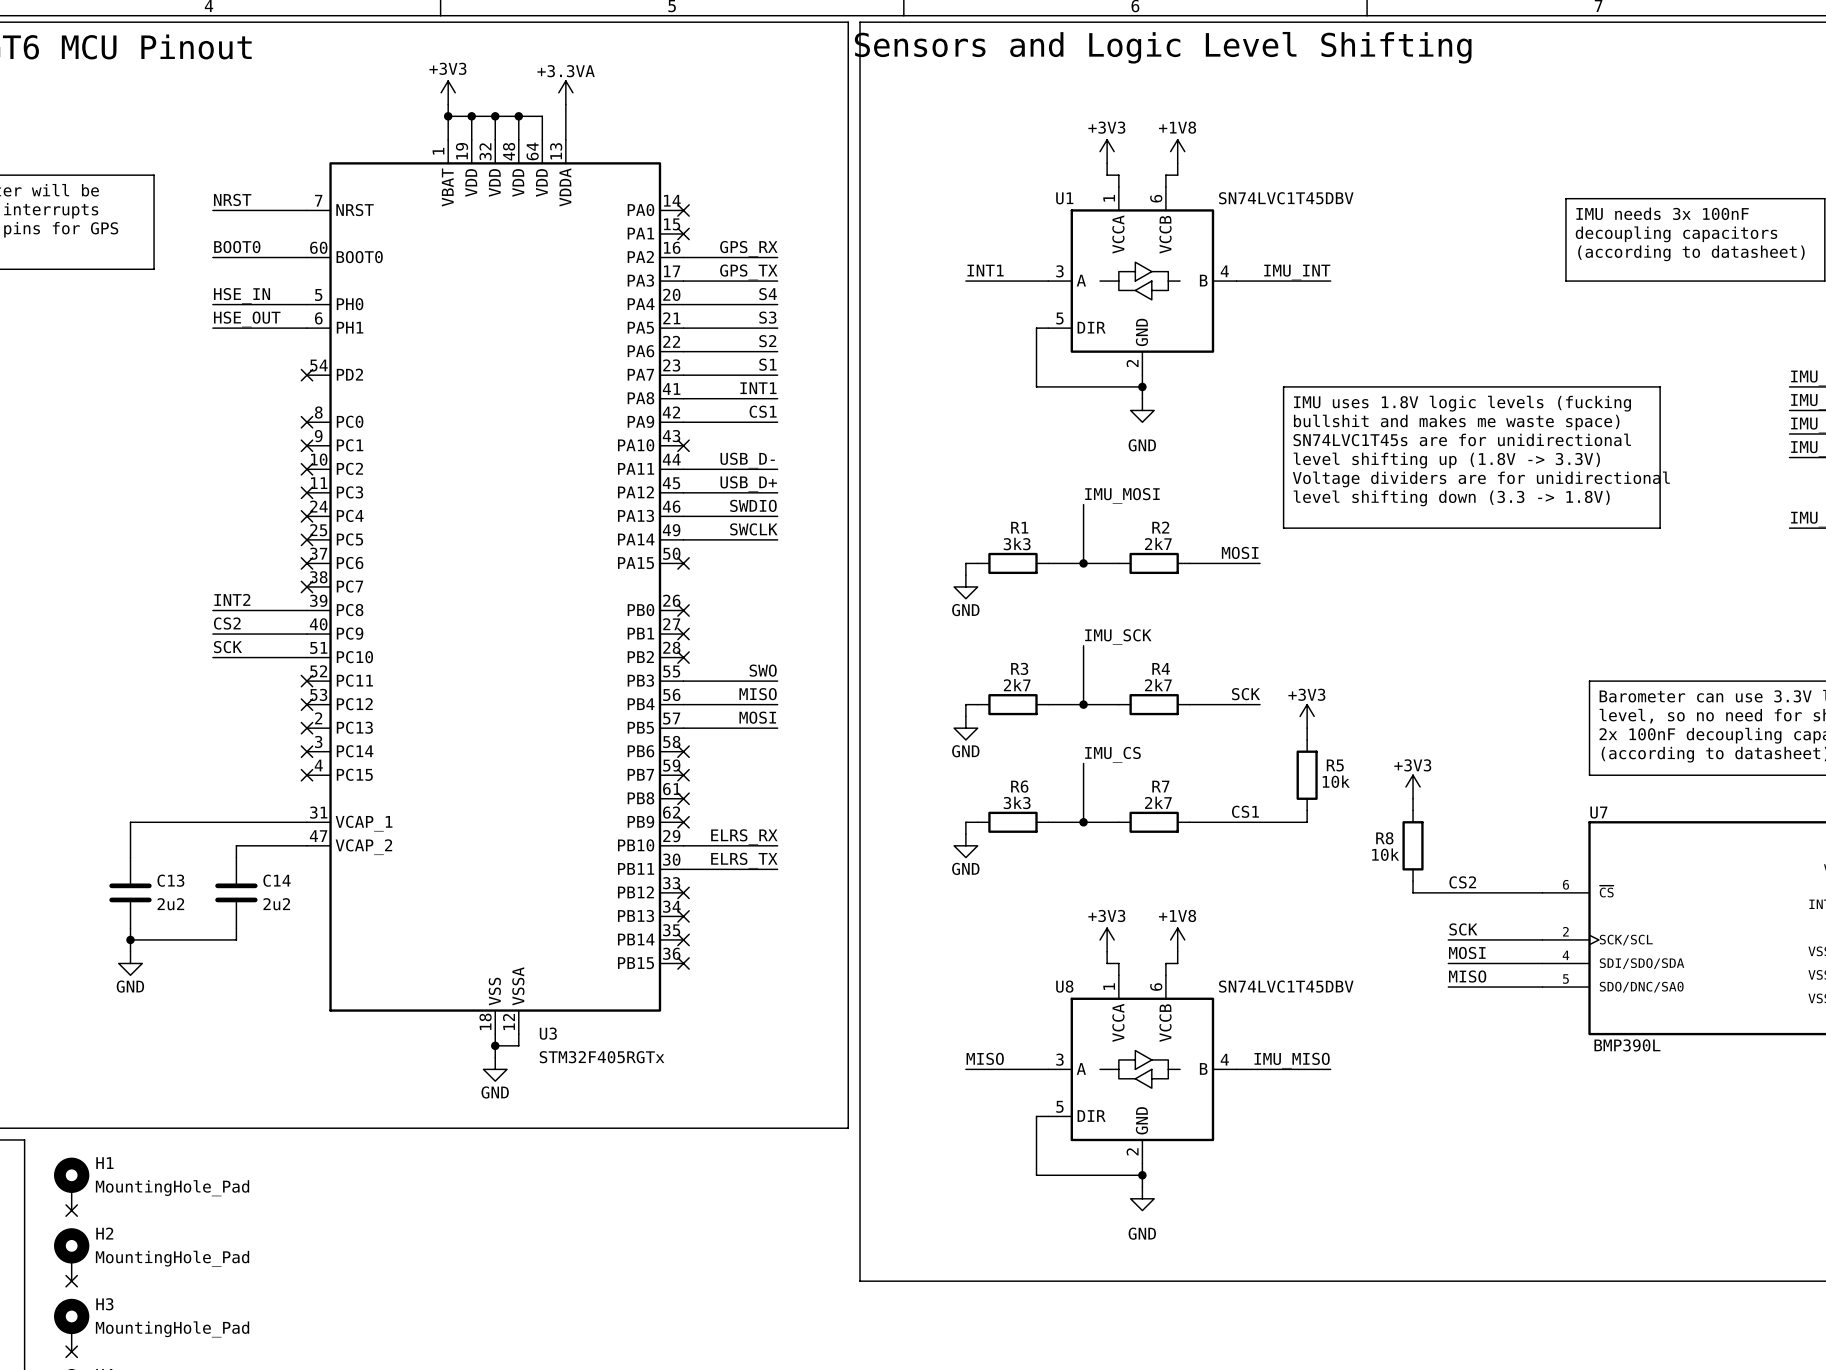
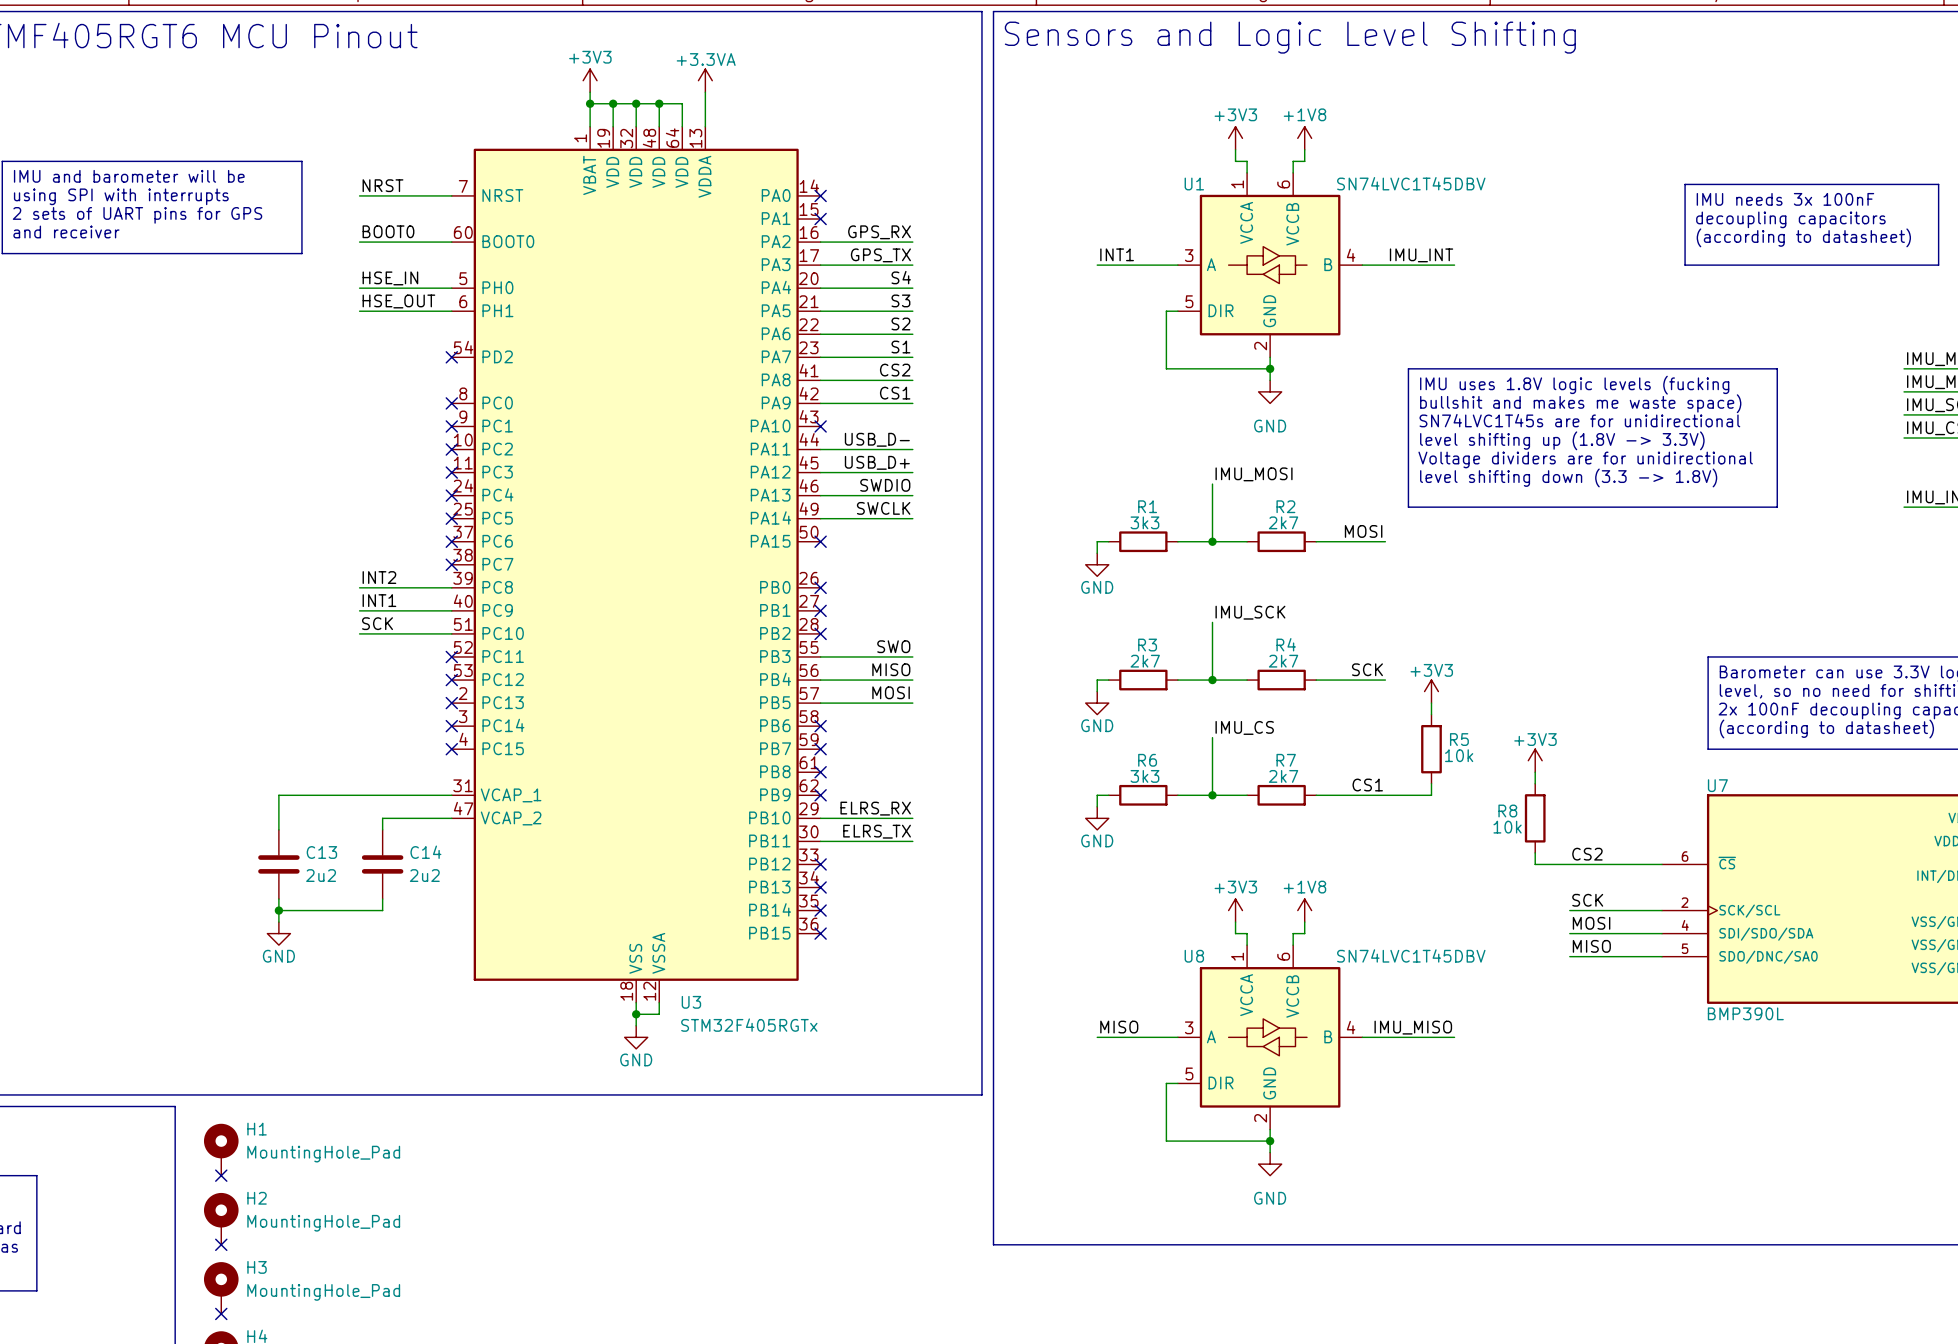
label: INT1 (758, 388) -> CS2 (895, 370)
label: CS2 (227, 623) -> INT1 (379, 600)

